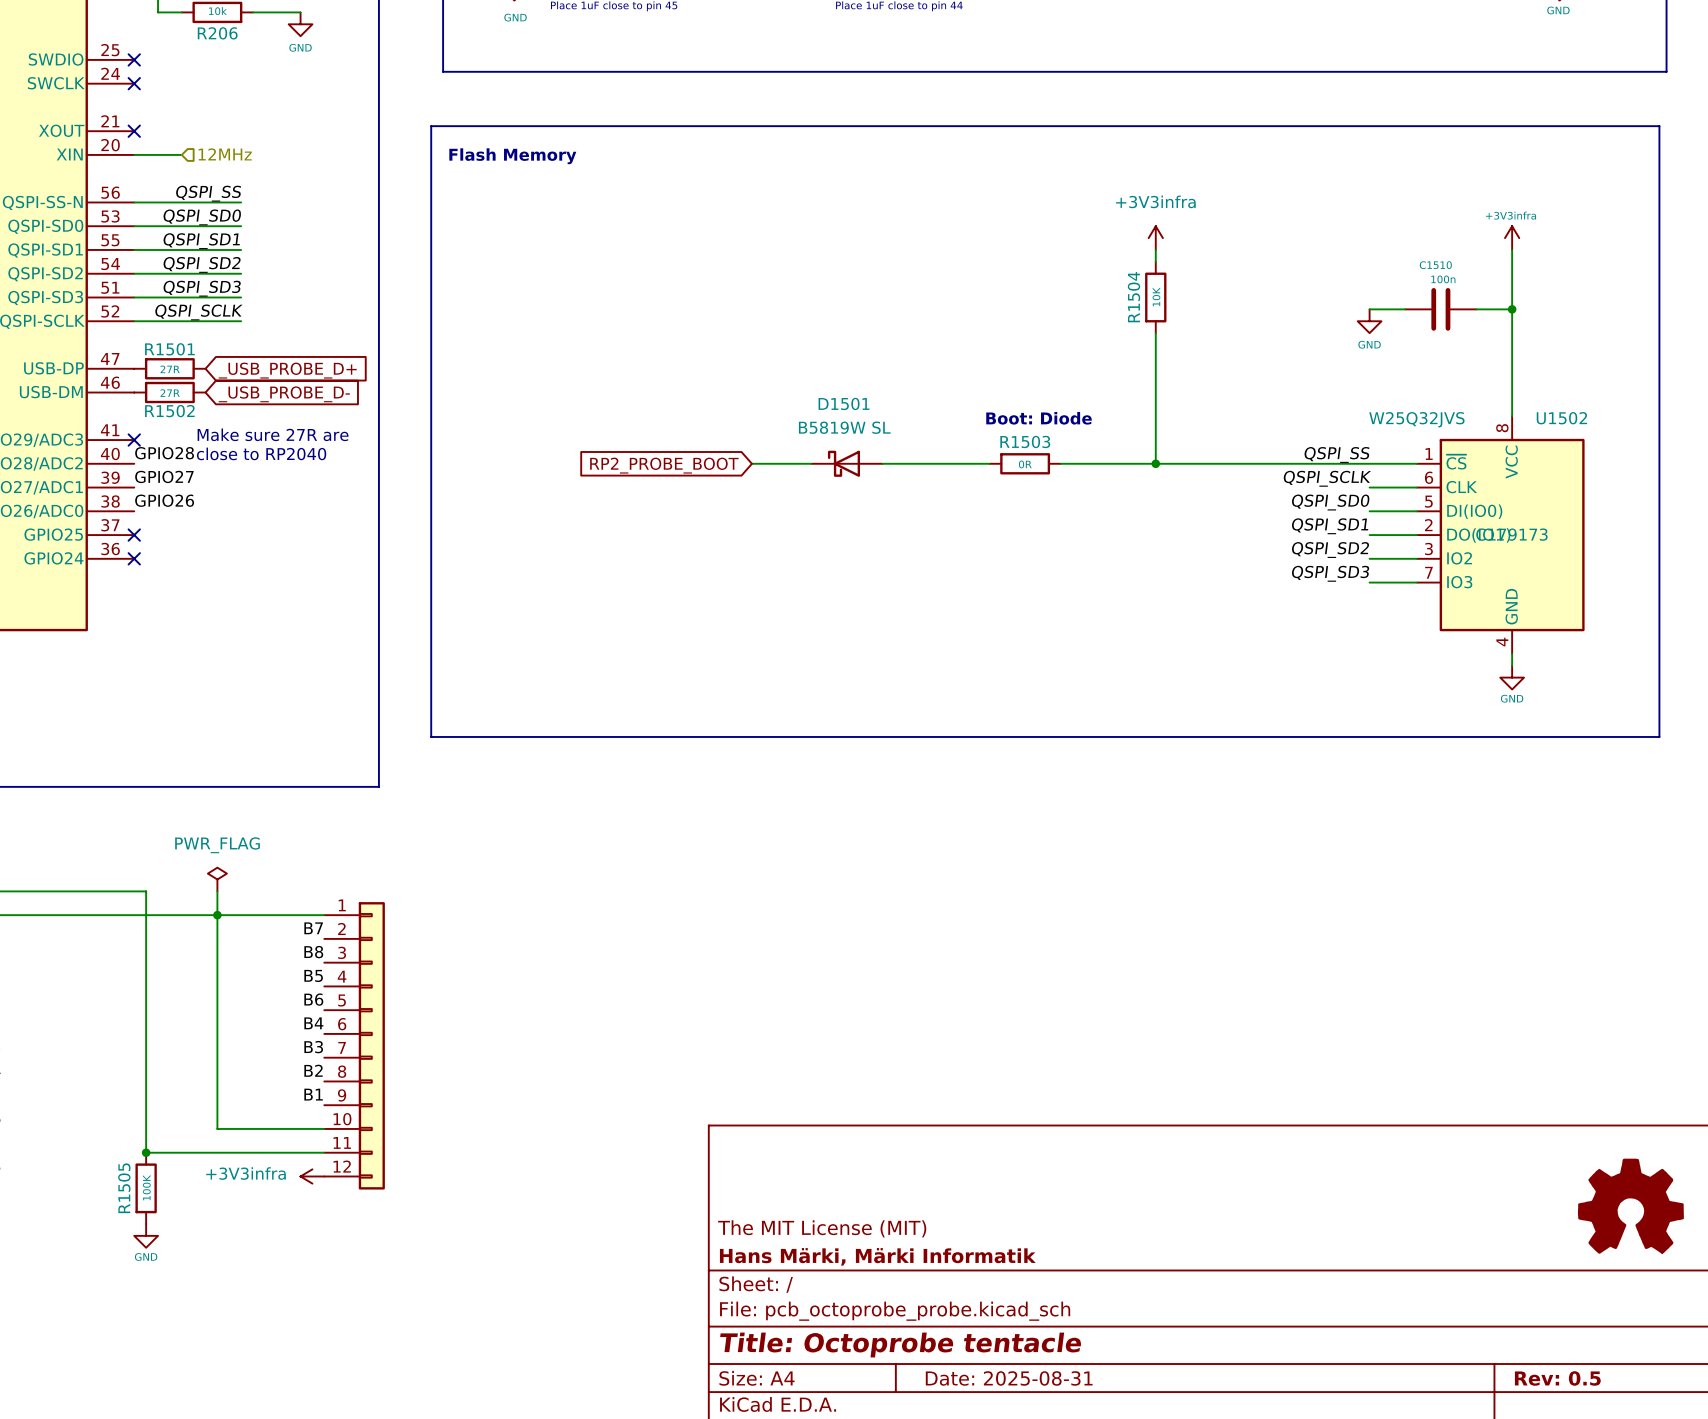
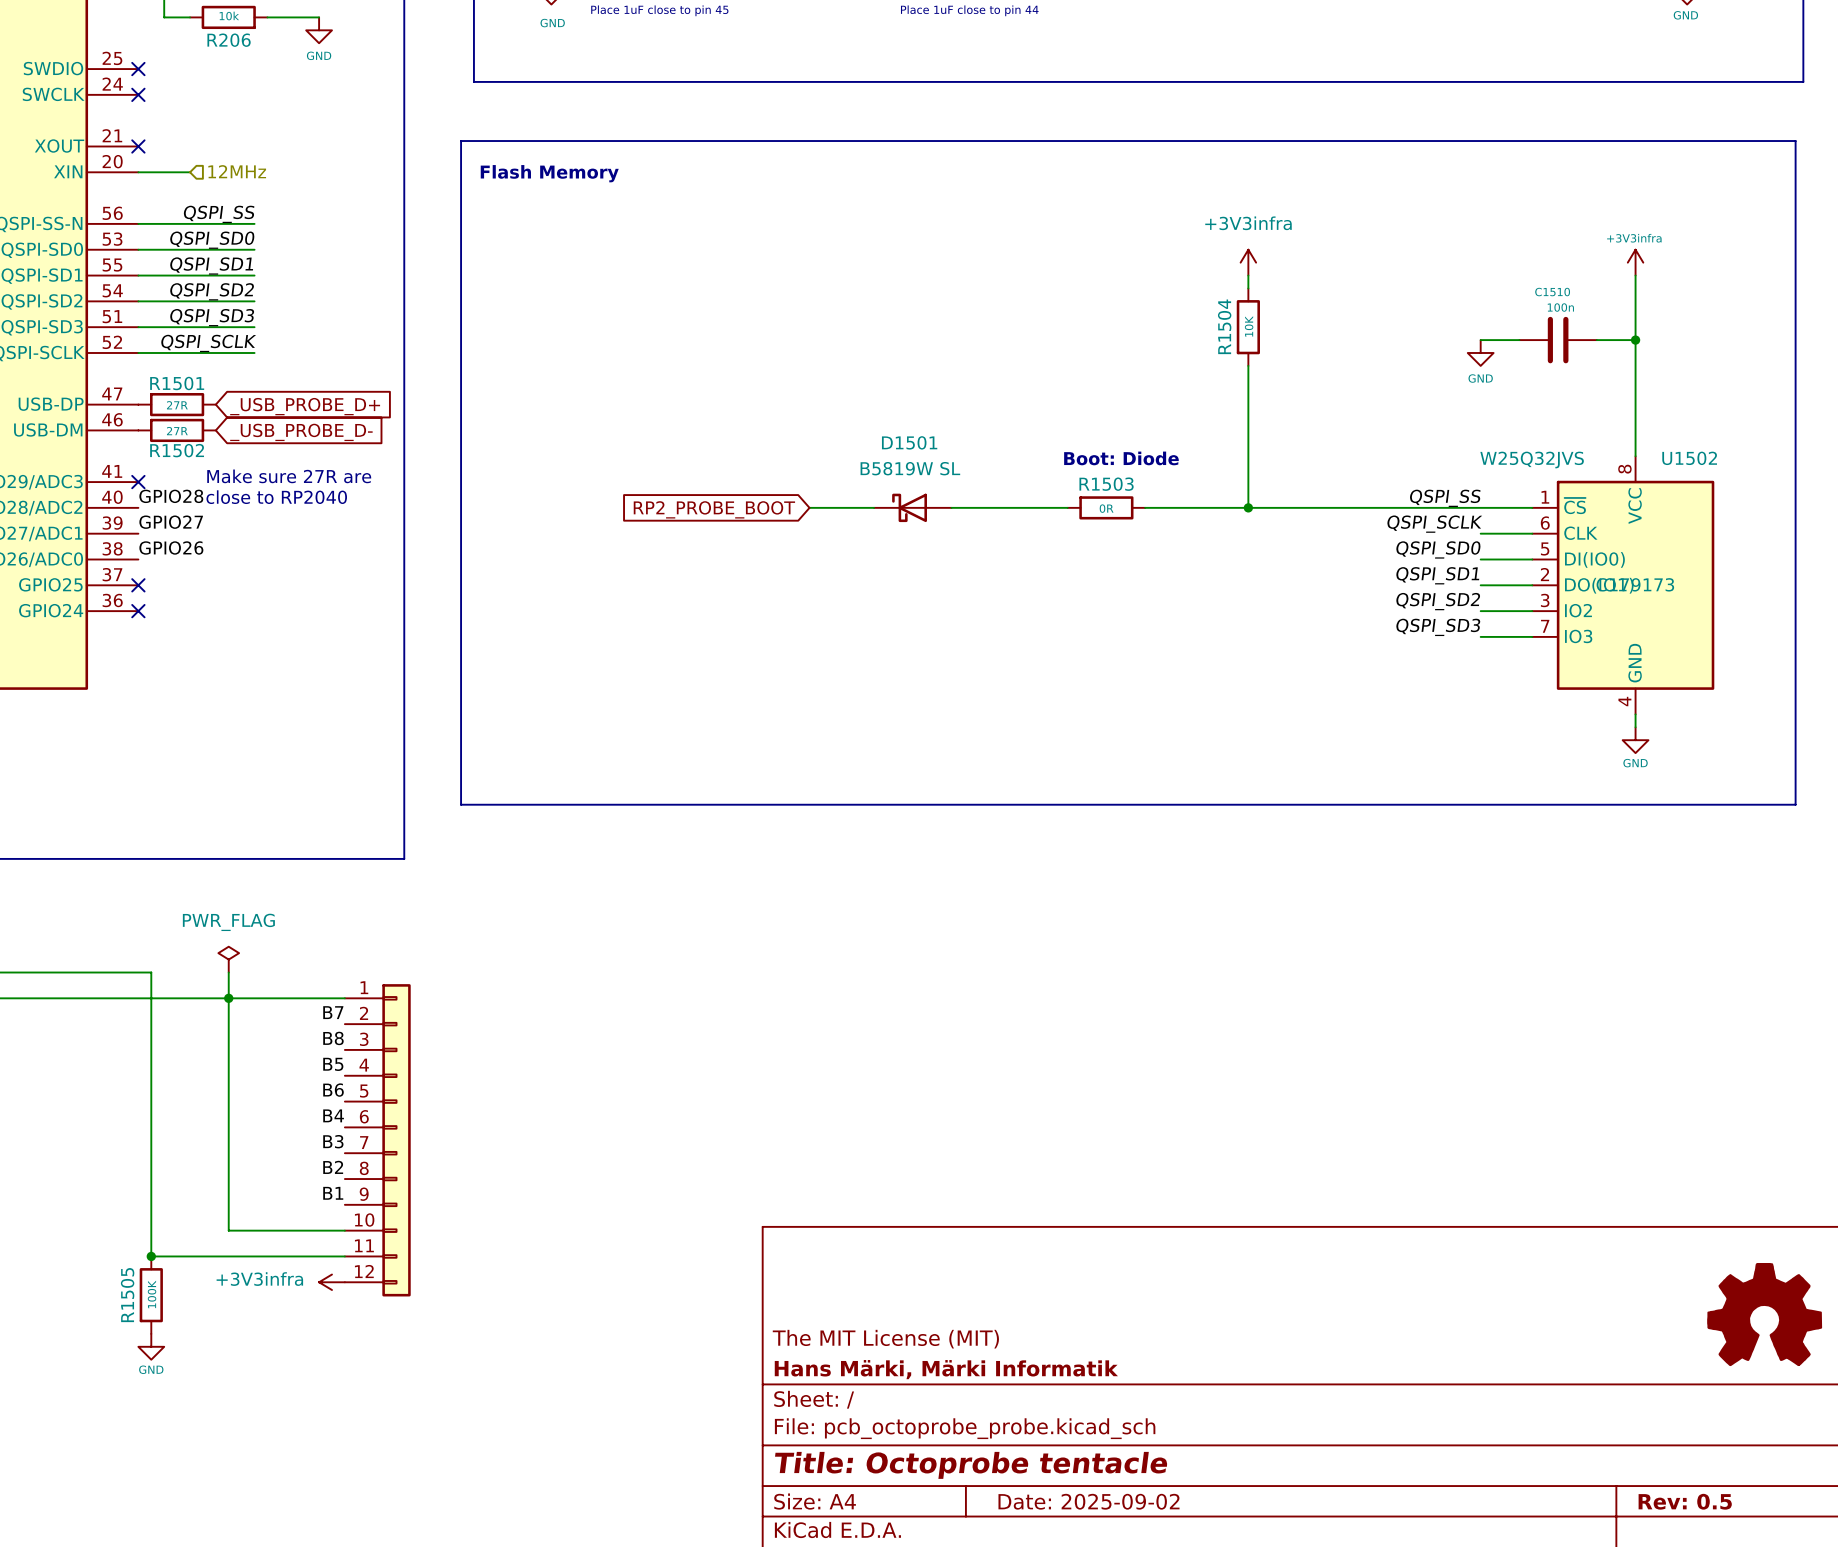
title block: Date: 2025-08-31 (1009, 1378) -> Date: 2025-09-02 (1089, 1501)

